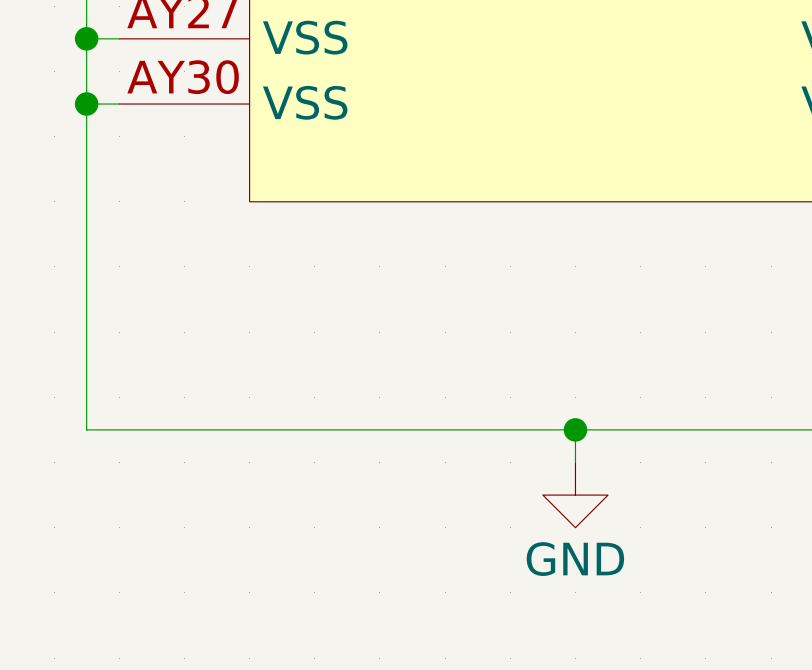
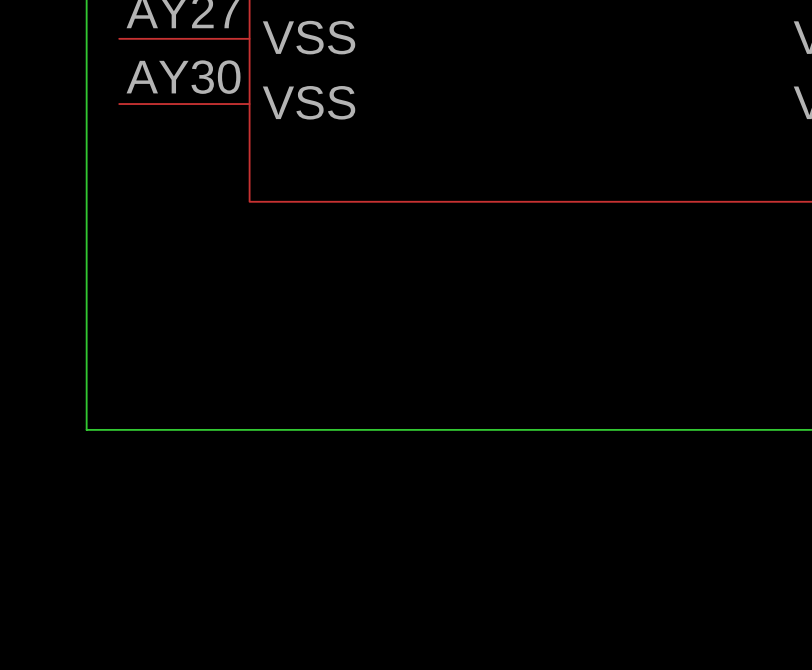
wire: (86, 38) (119, 38) -> none
junction: (86, 38) -> none
wire: (86, 104) (119, 104) -> none
junction: (86, 104) -> none
wire: (575, 429) (575, 462) -> none
junction: (575, 429) -> none
power symbol: GND (575, 495) -> none

